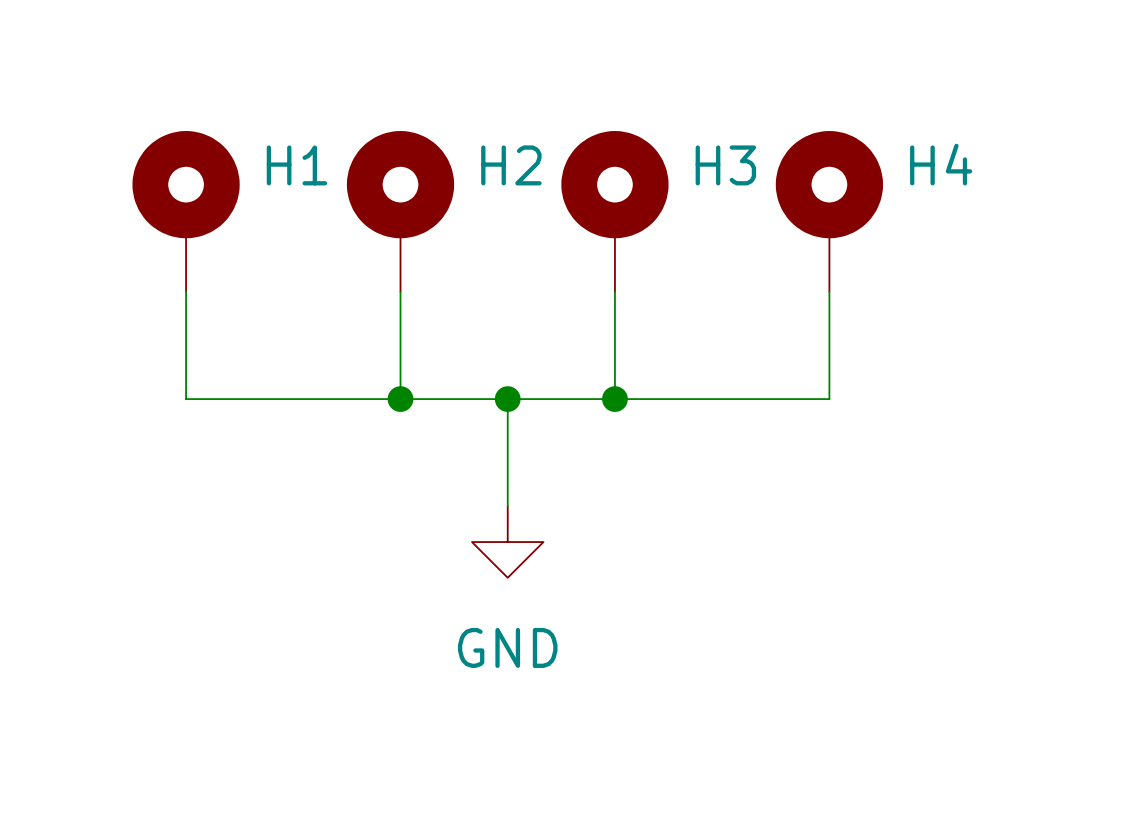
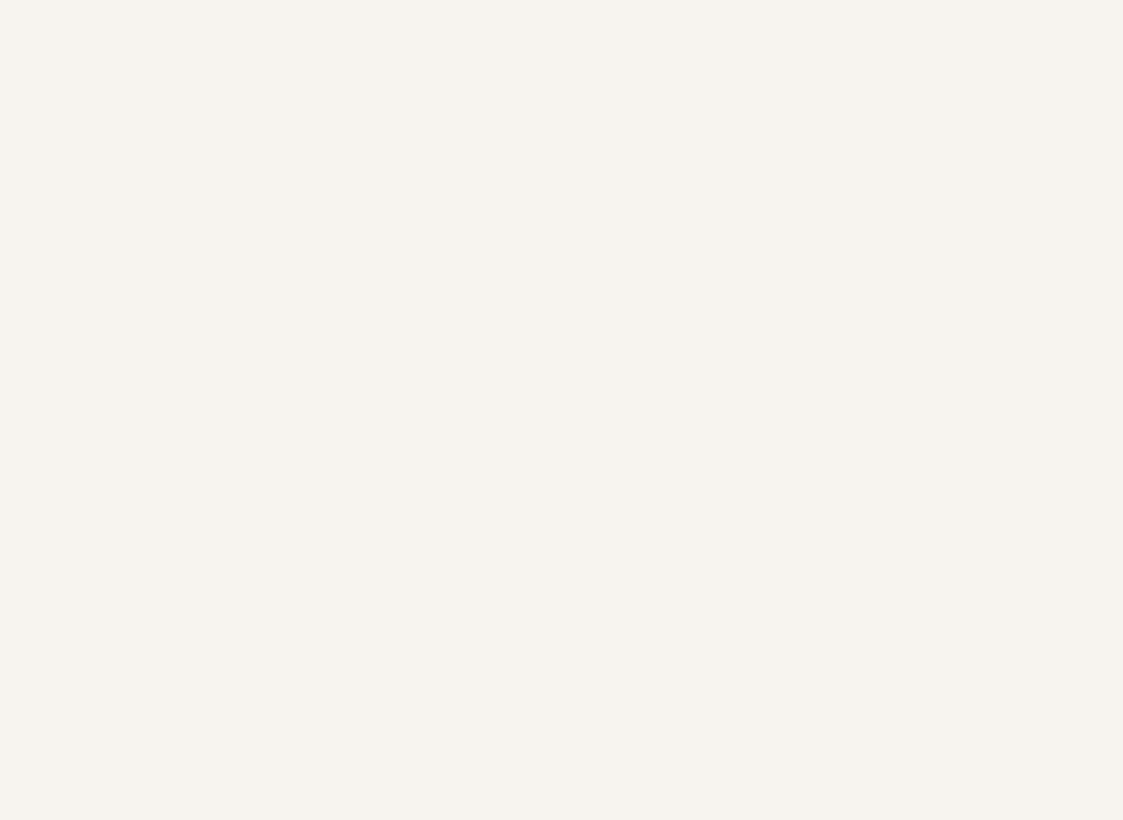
H1: (186, 211) -> none
H2: (400, 211) -> none
H3: (614, 211) -> none
H4: (829, 211) -> none
wire: (186, 291) (186, 399) (829, 399) (829, 291) -> none
wire: (400, 291) (400, 399) -> none
wire: (614, 291) (614, 399) -> none
junction: (400, 399) -> none
wire: (507, 399) (507, 506) -> none
junction: (507, 399) -> none
junction: (614, 399) -> none
power symbol: GND (507, 542) -> none

